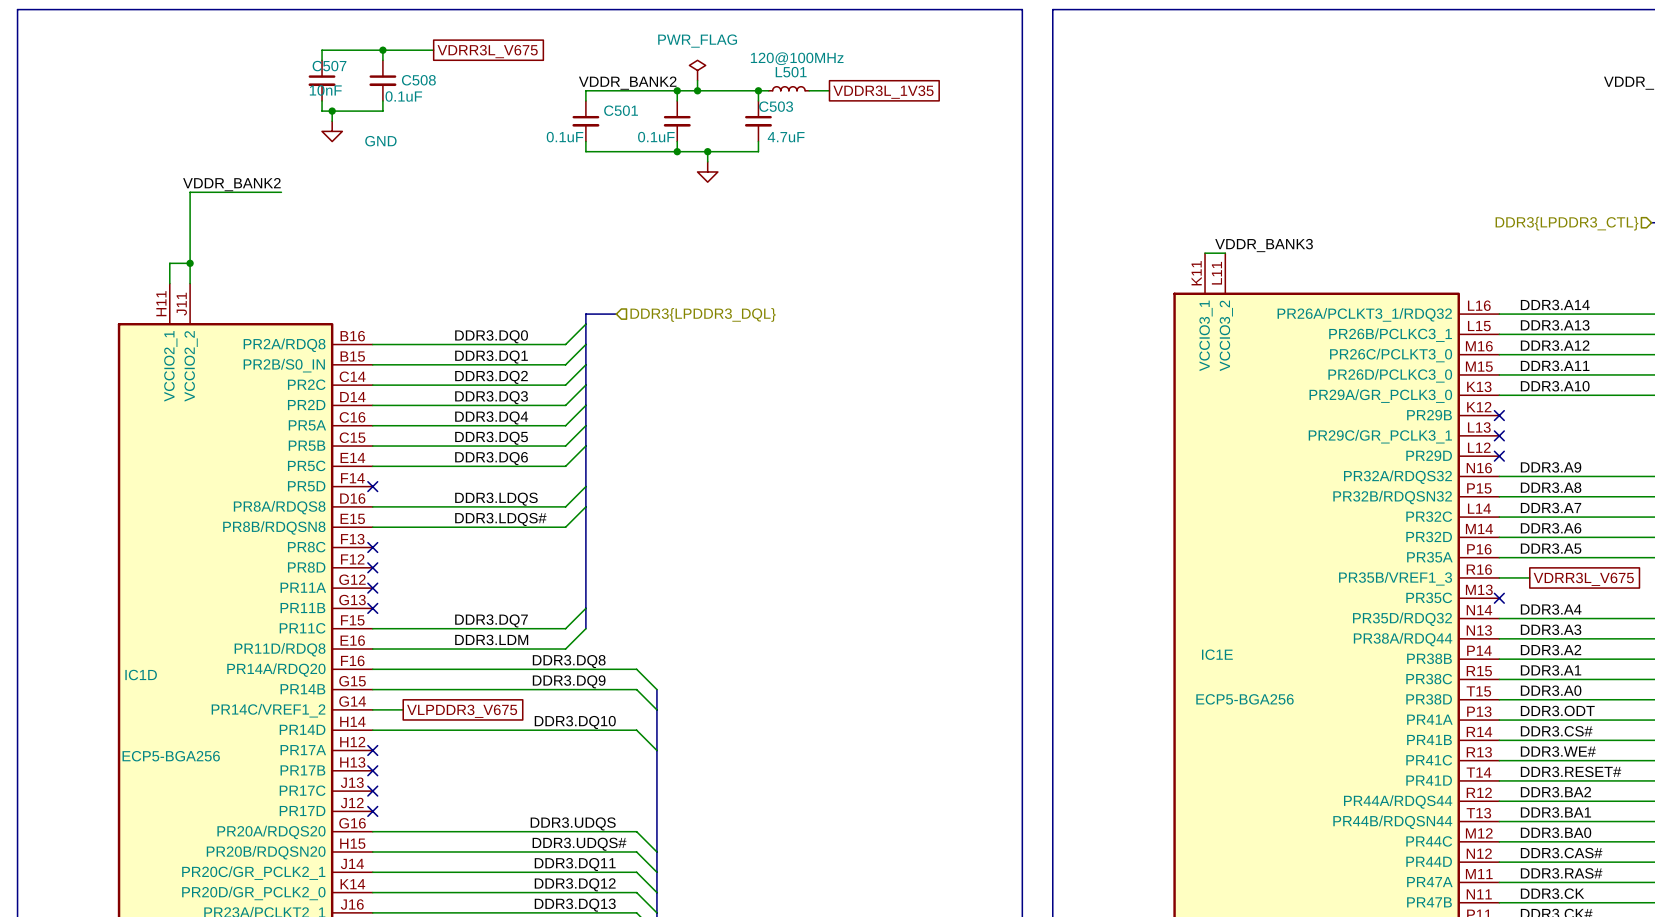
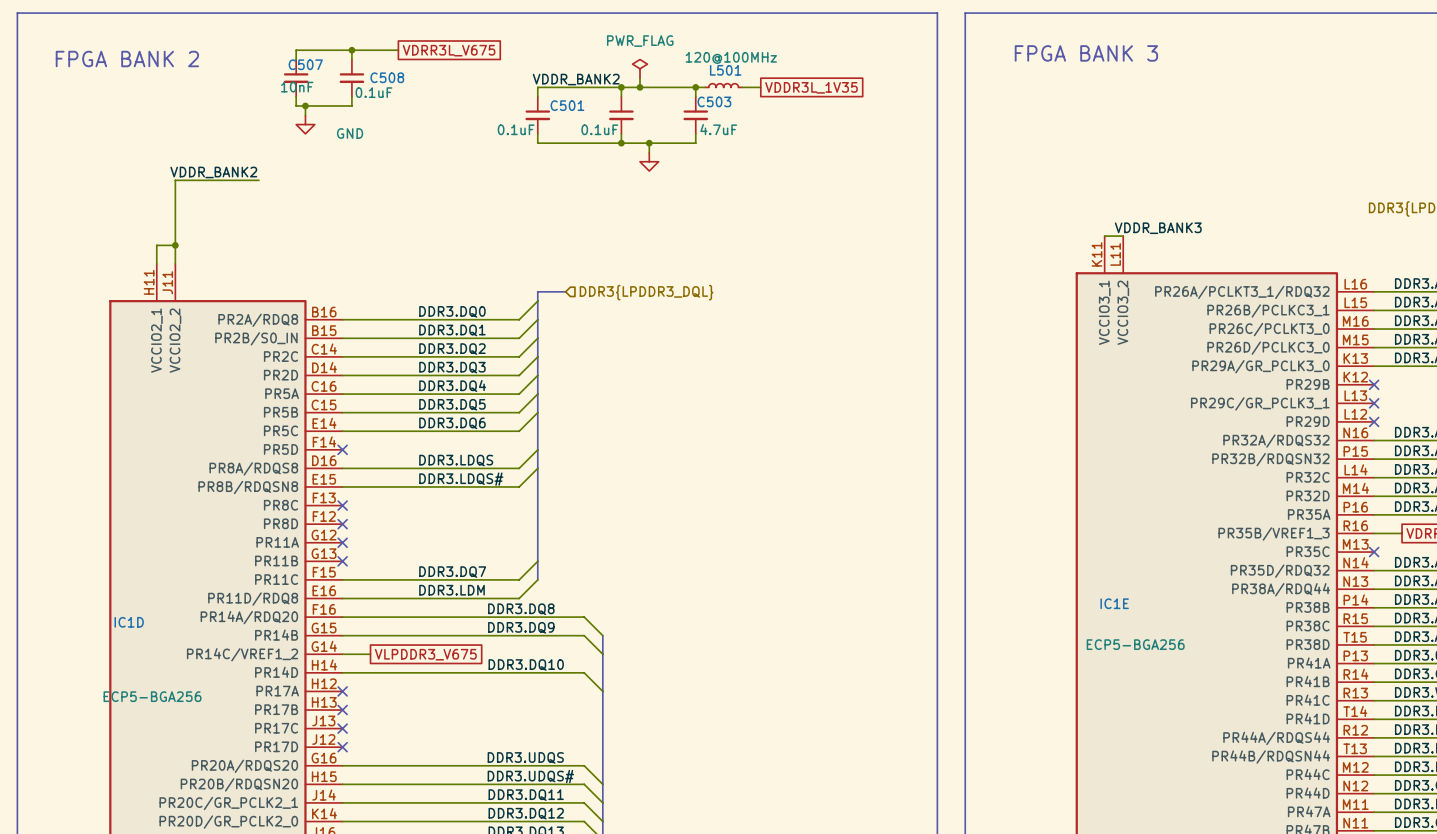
text: none -> FPGA BANK 3 (1086, 53)
text: none -> FPGA BANK 2 (127, 59)

